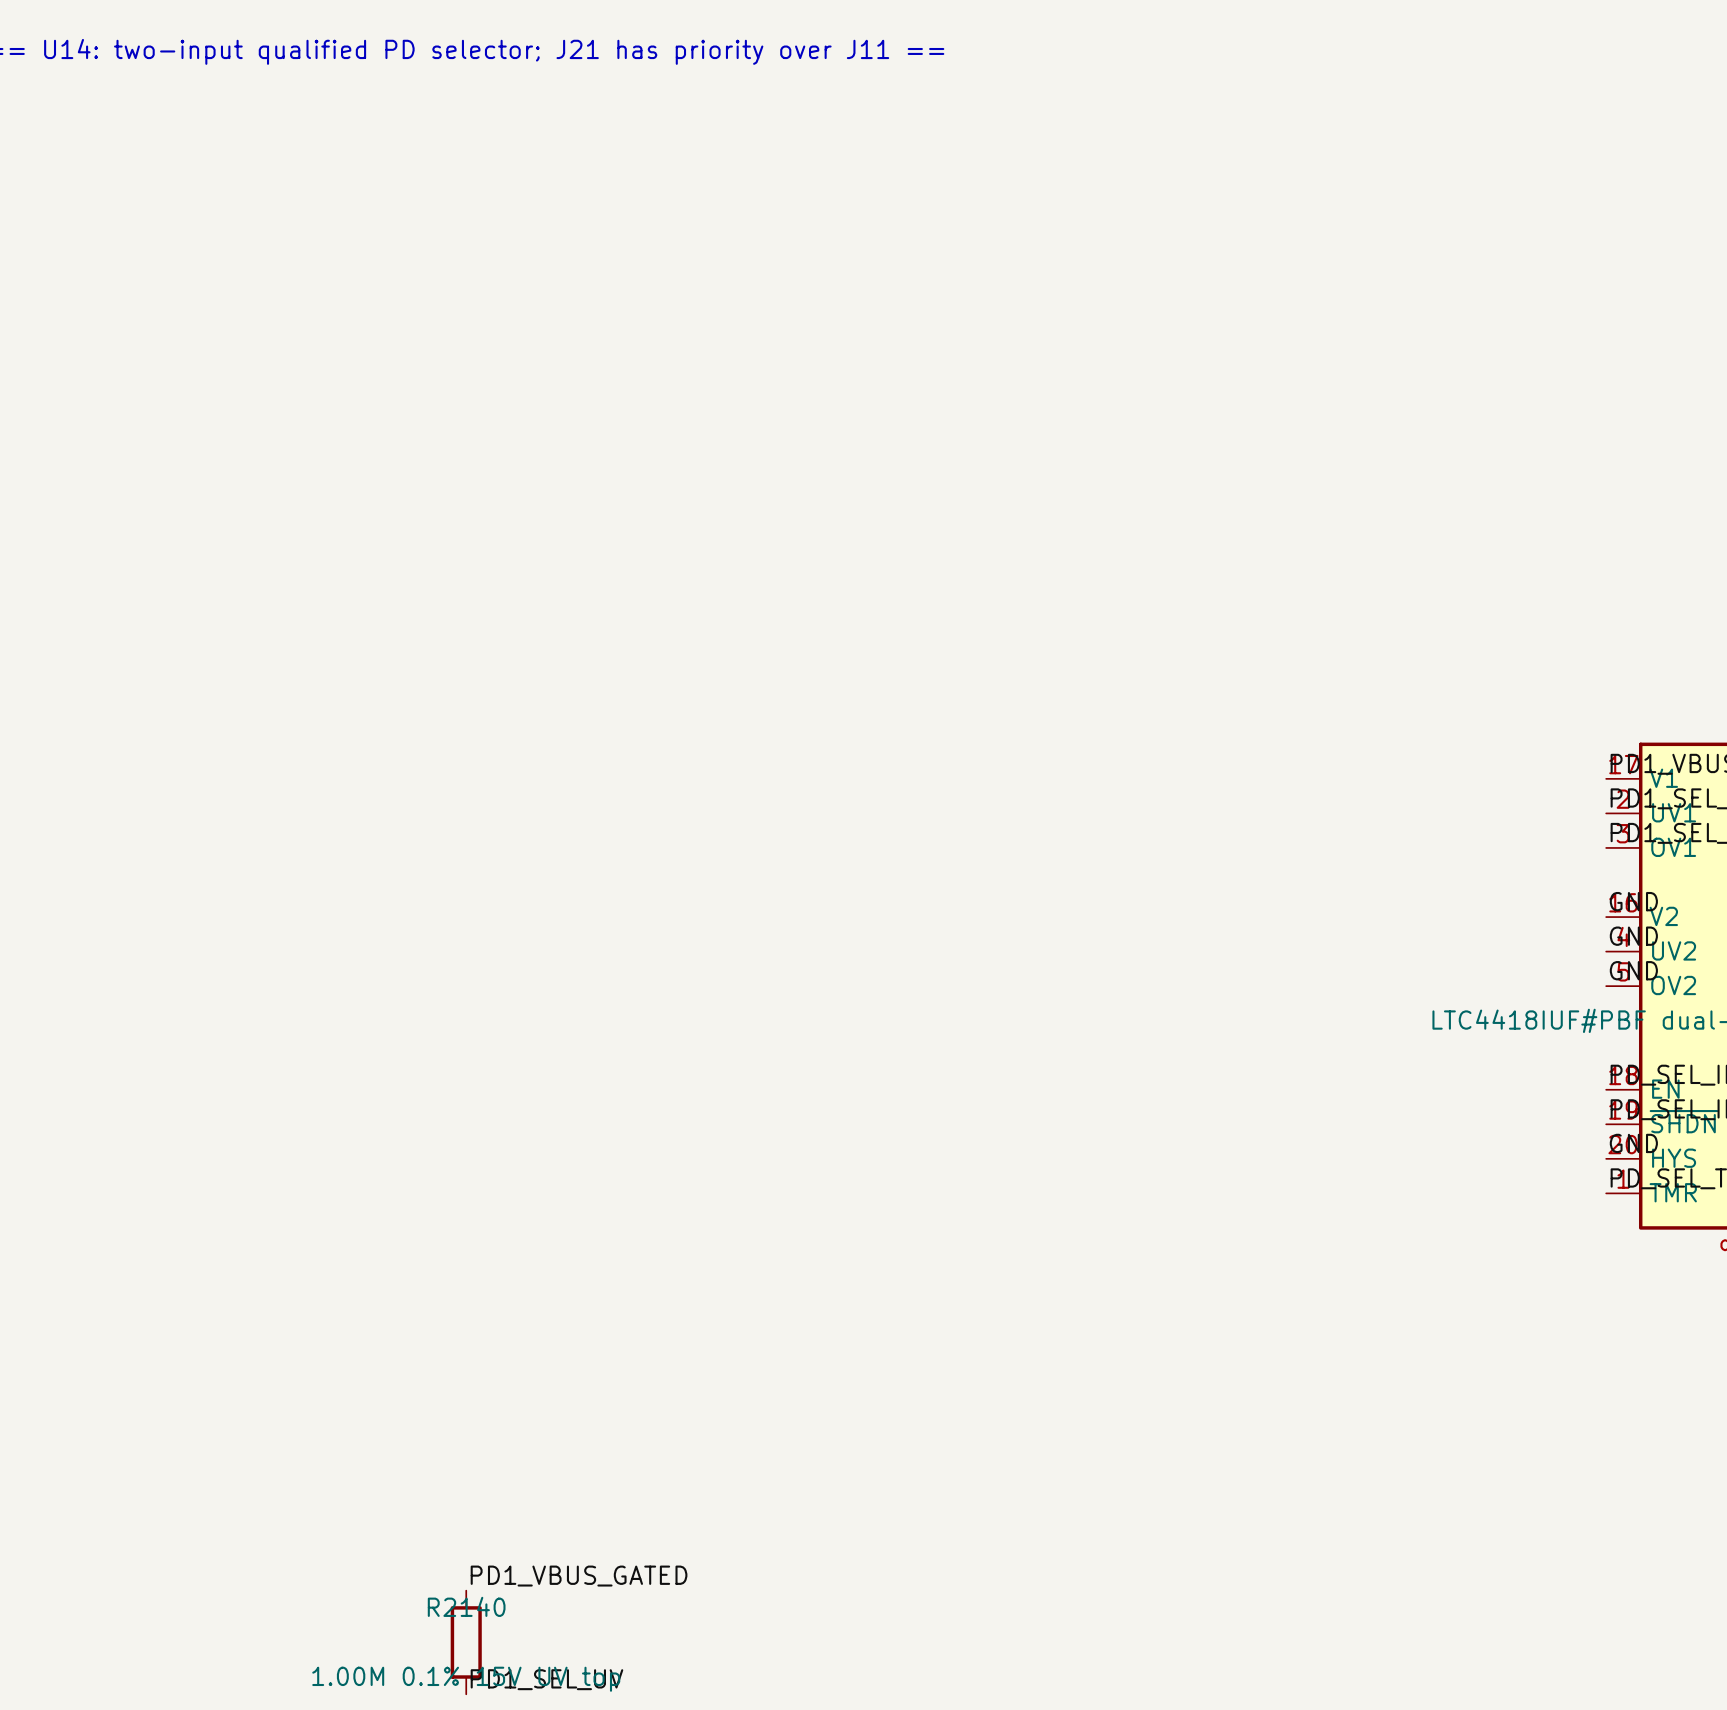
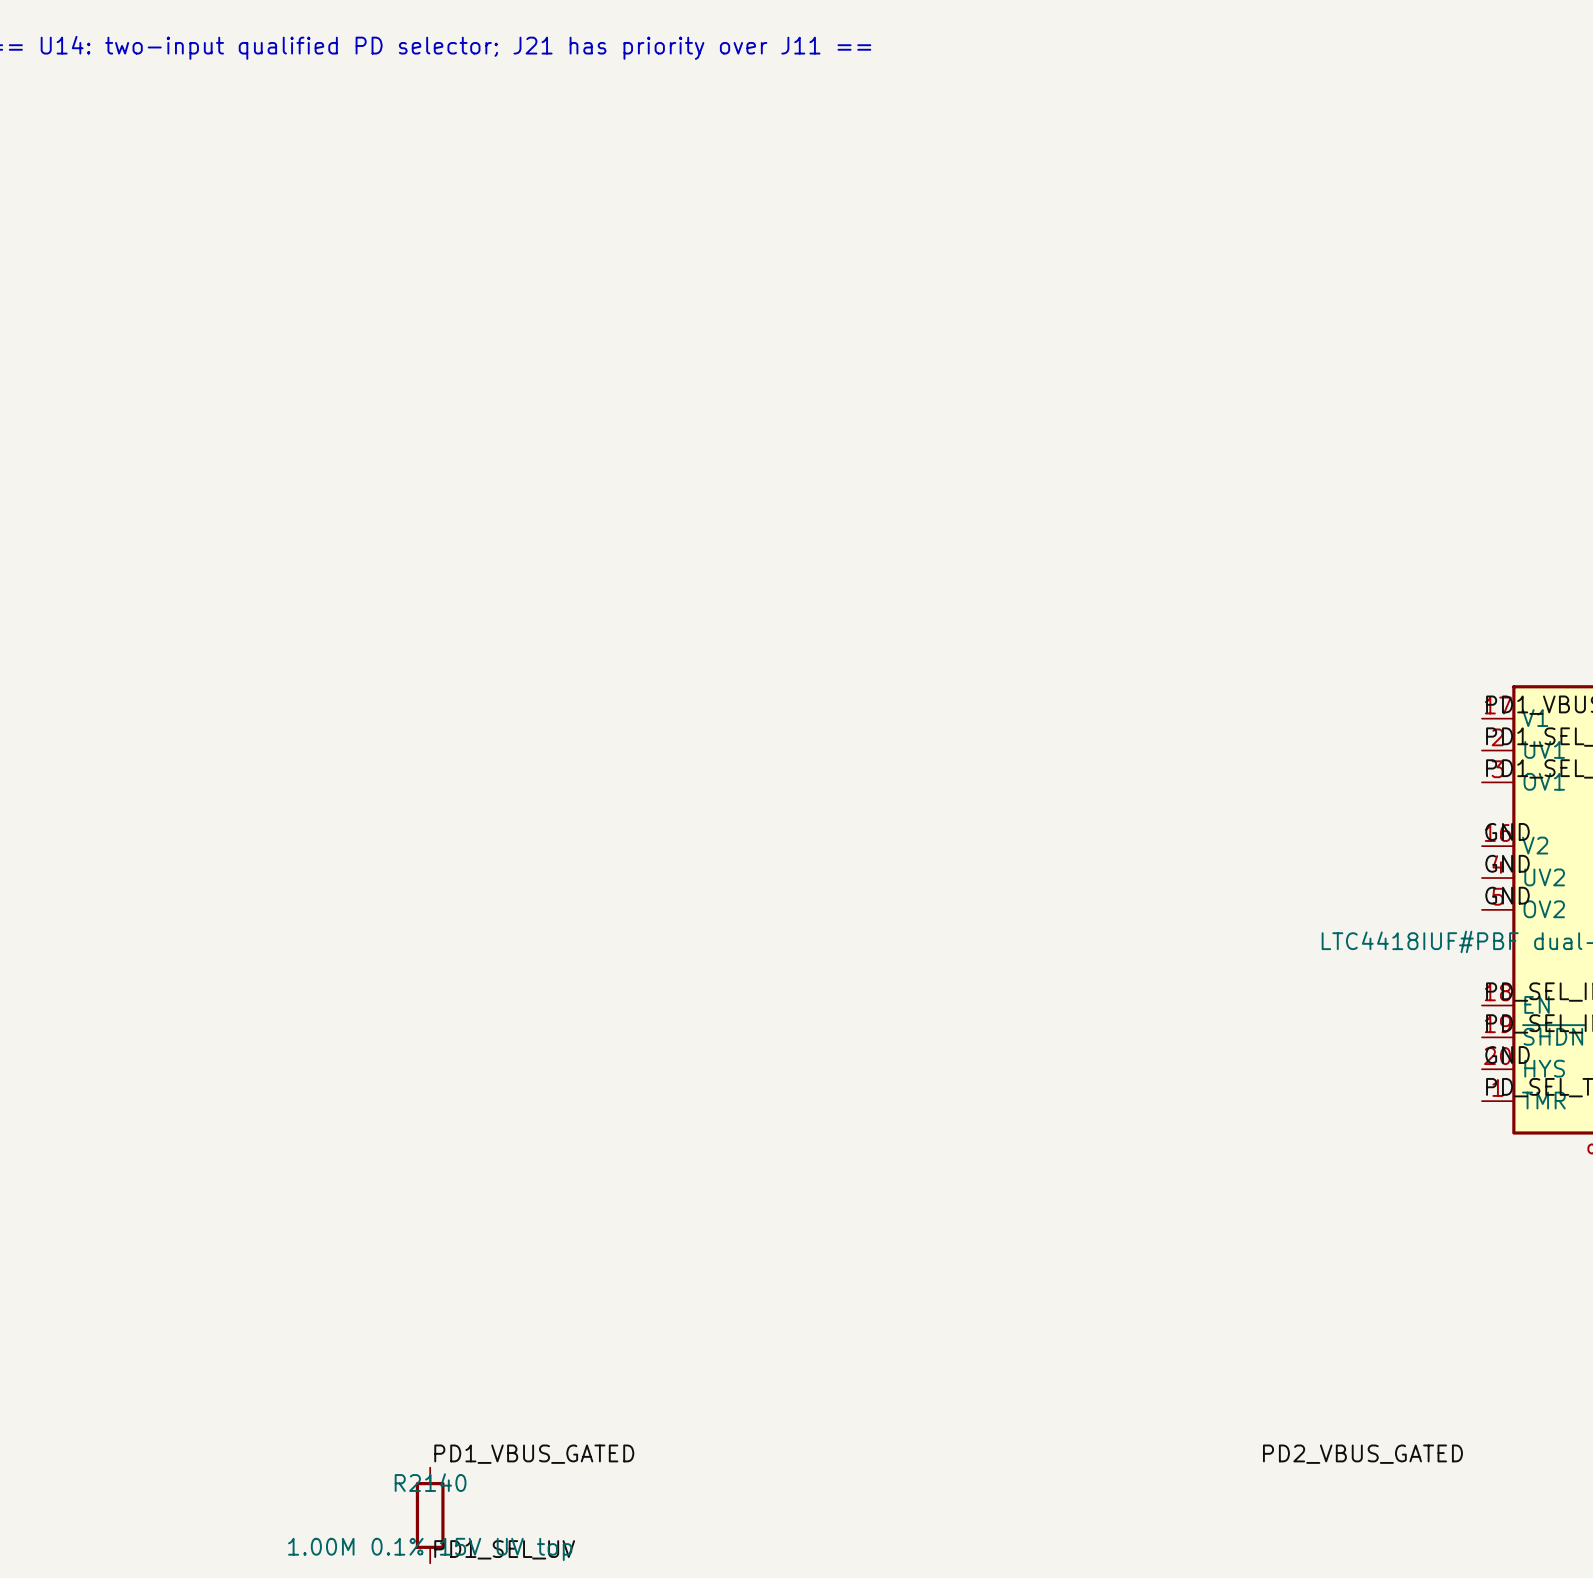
label: none -> PD2_VBUS_GATED (1362, 1454)

